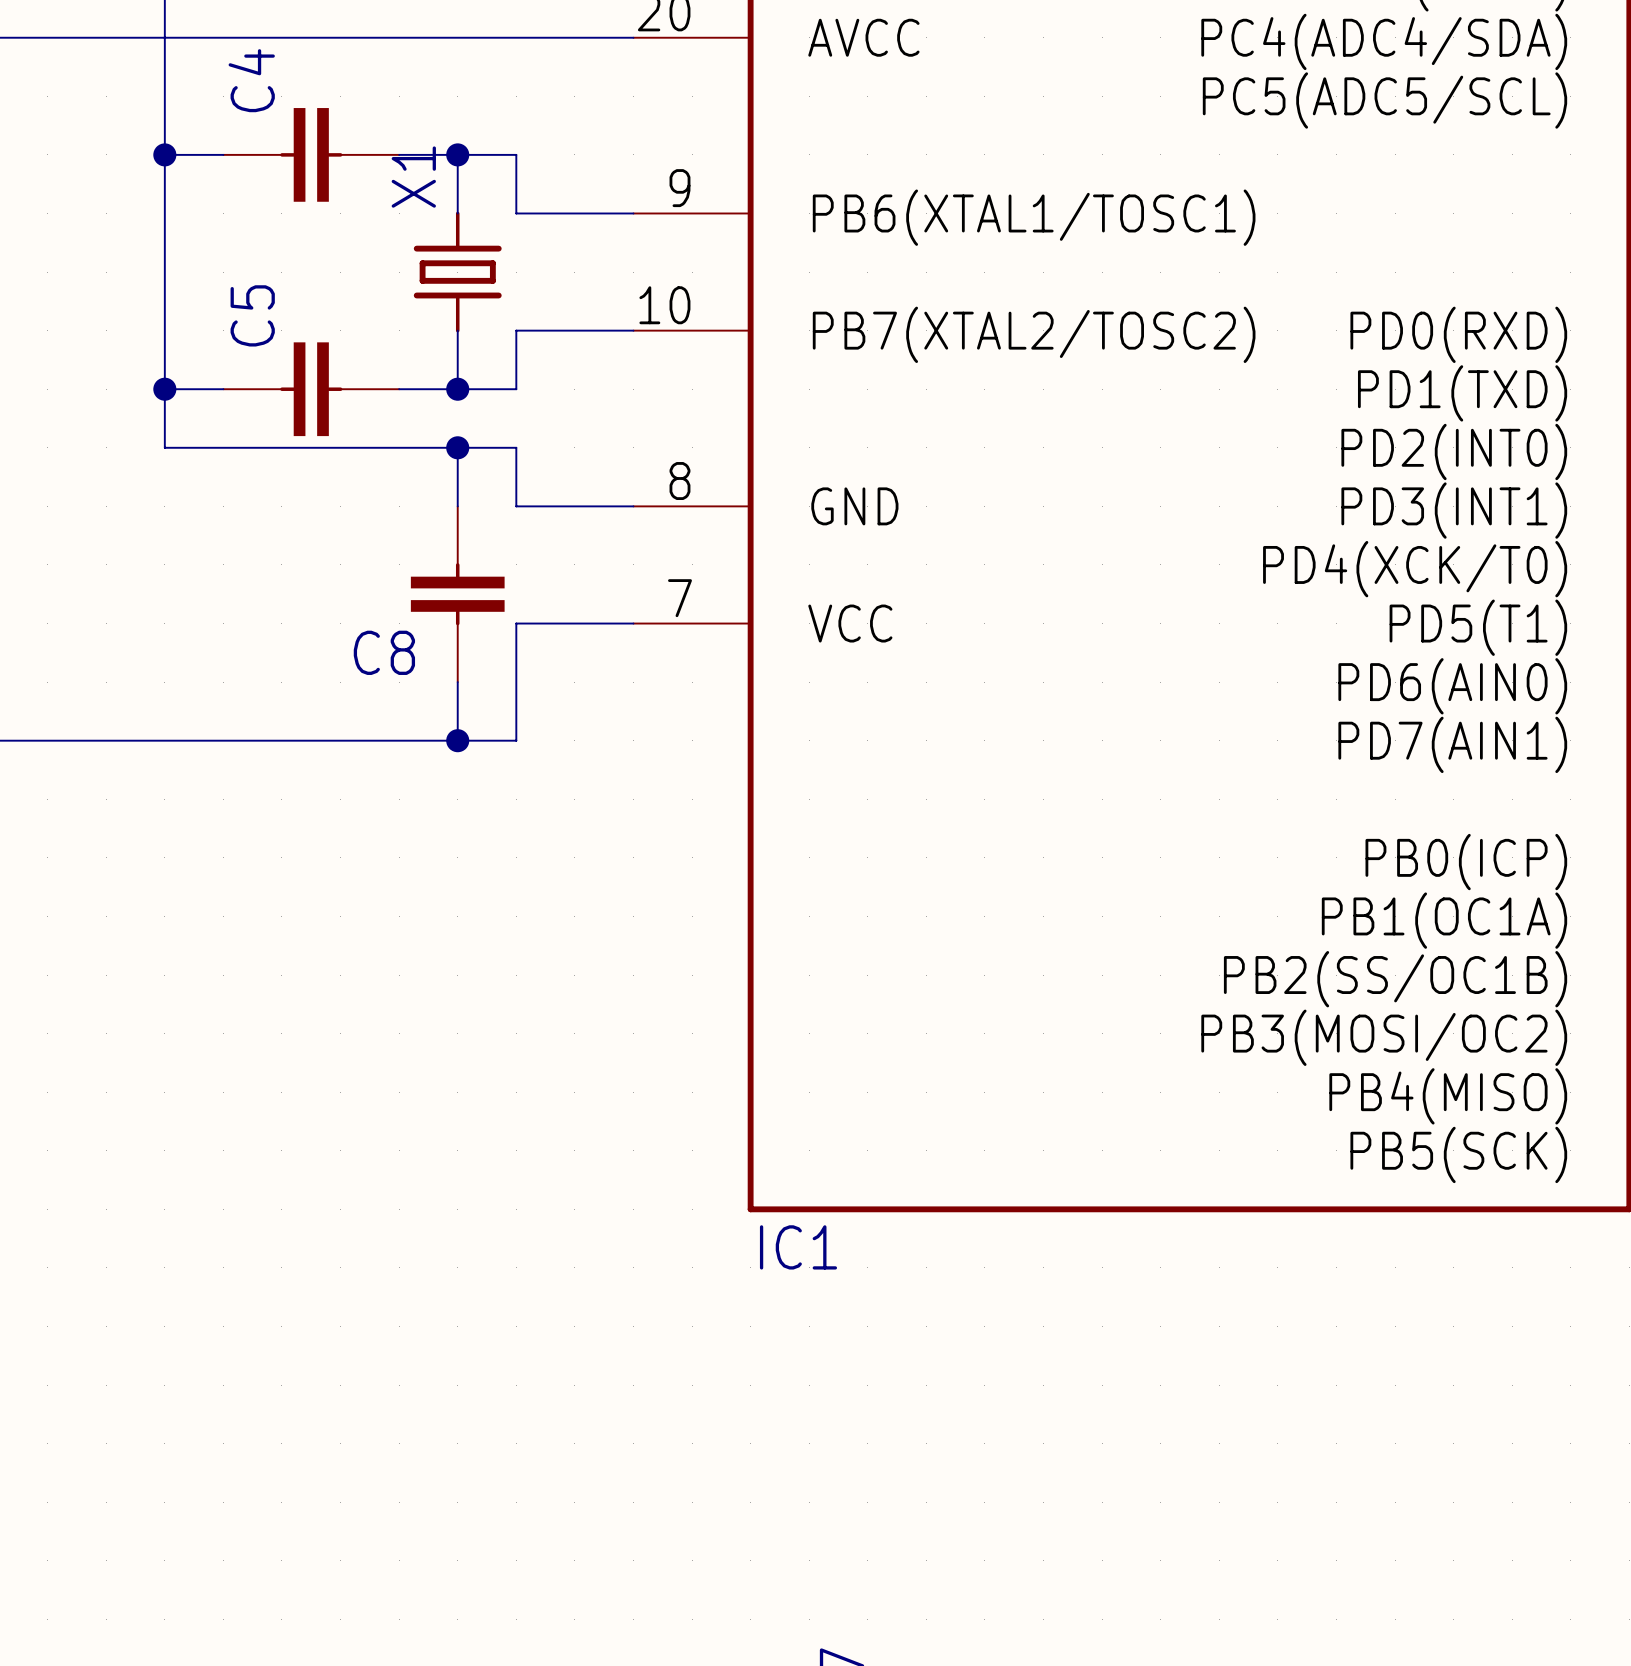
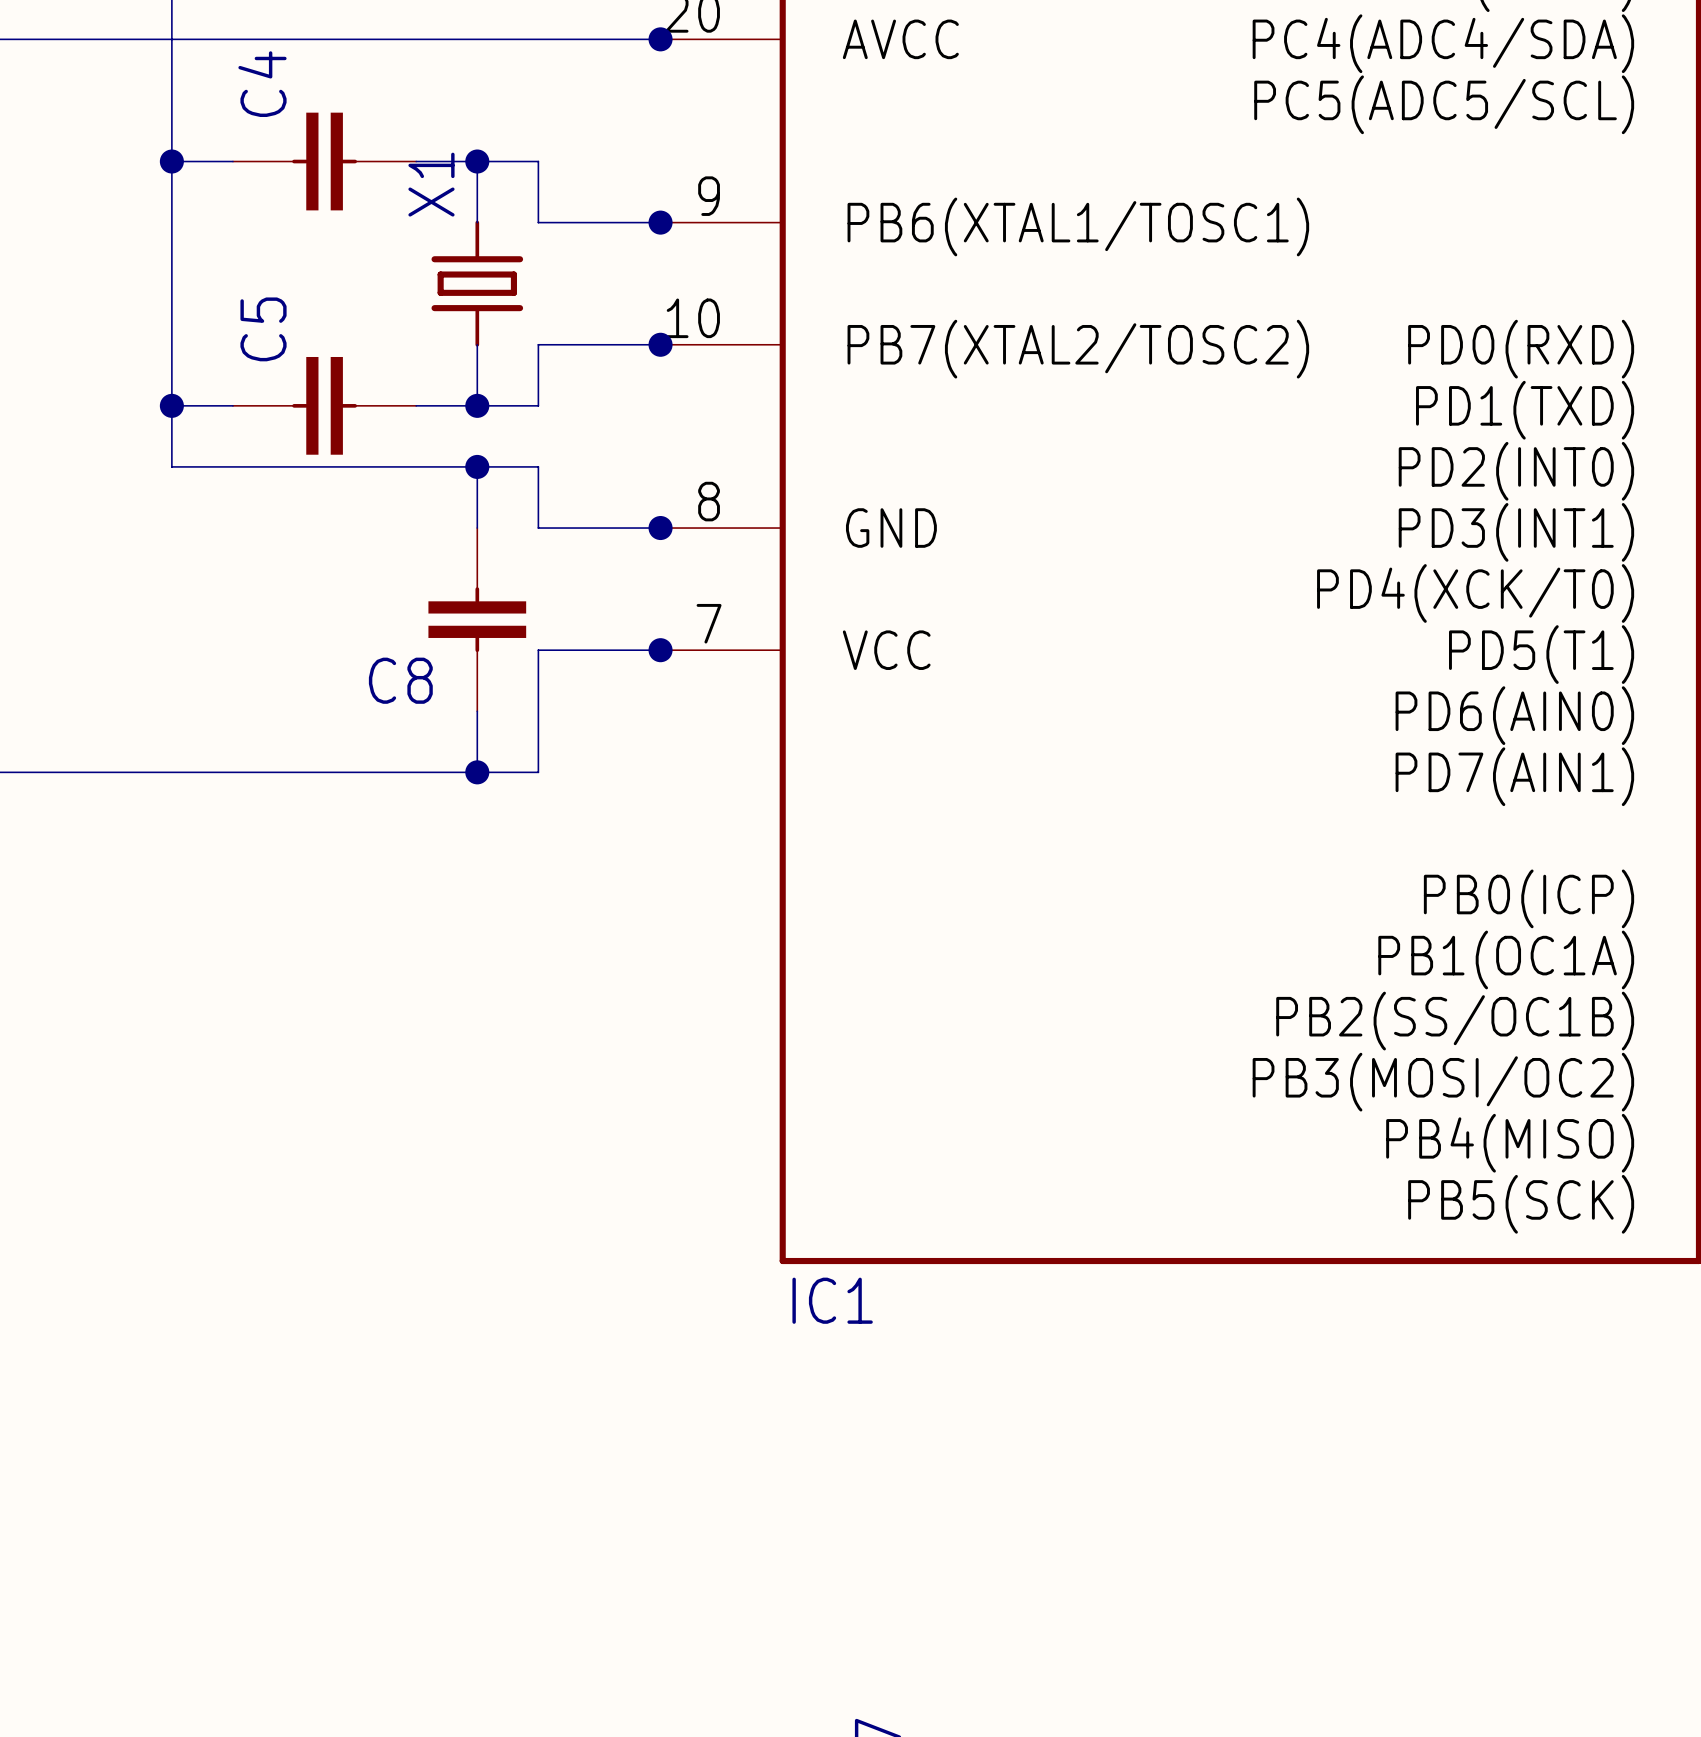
junction: none -> (660, 39)
junction: none -> (660, 222)
junction: none -> (660, 344)
junction: none -> (660, 528)
junction: none -> (660, 650)

